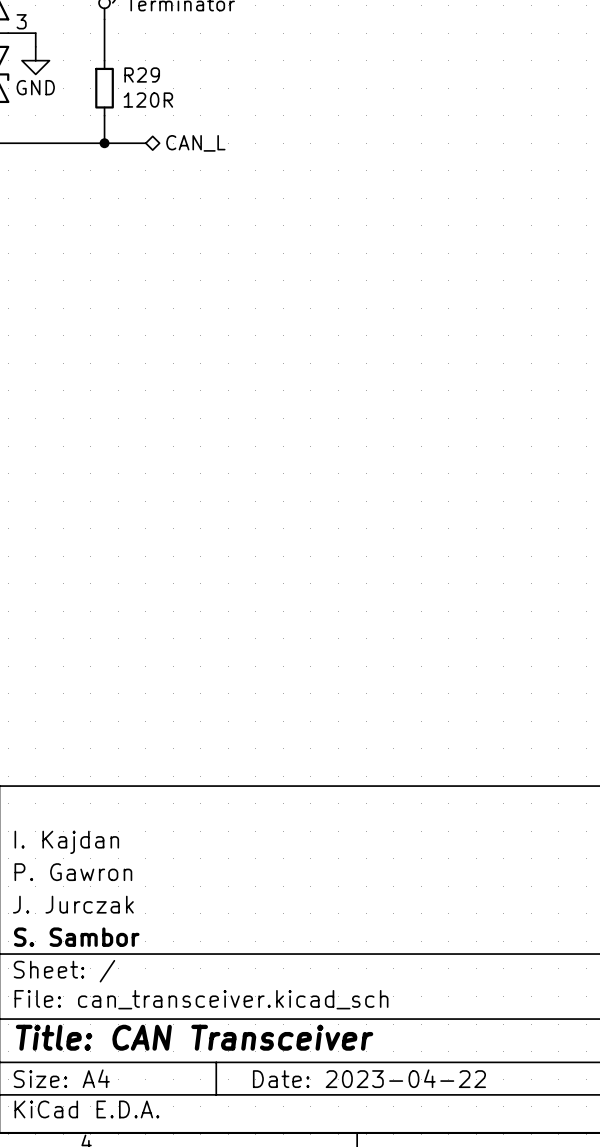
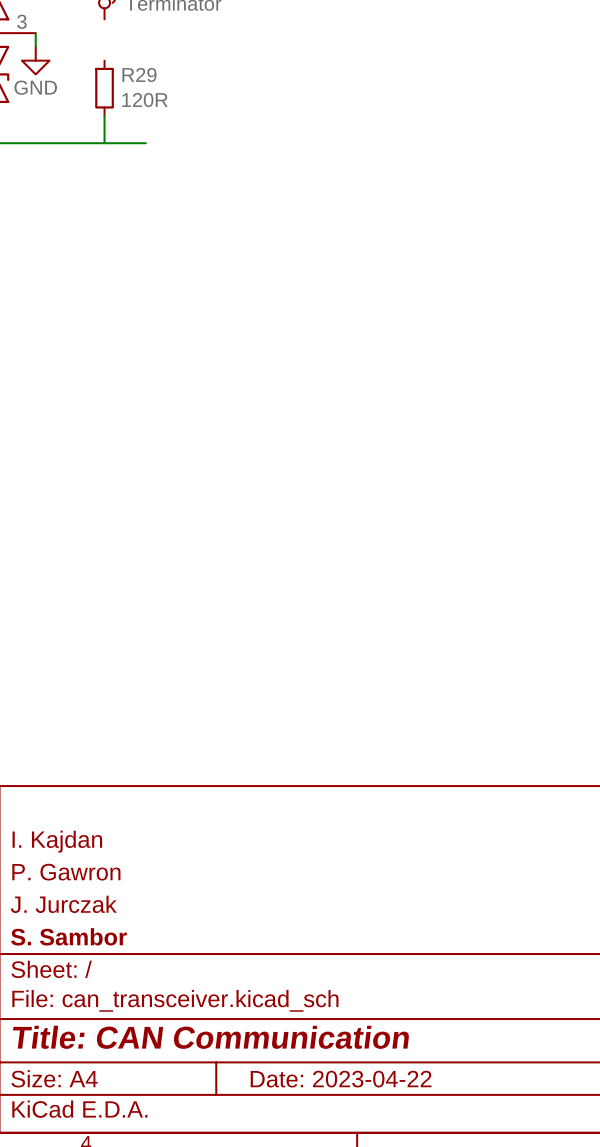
wire: (104, 19) (104, 60) -> none
junction: (104, 143) -> none
hierarchical label: CAN_L (195, 143) -> none
title block: Title: CAN Transceiver (194, 1037) -> Title: CAN Communication (211, 1037)

